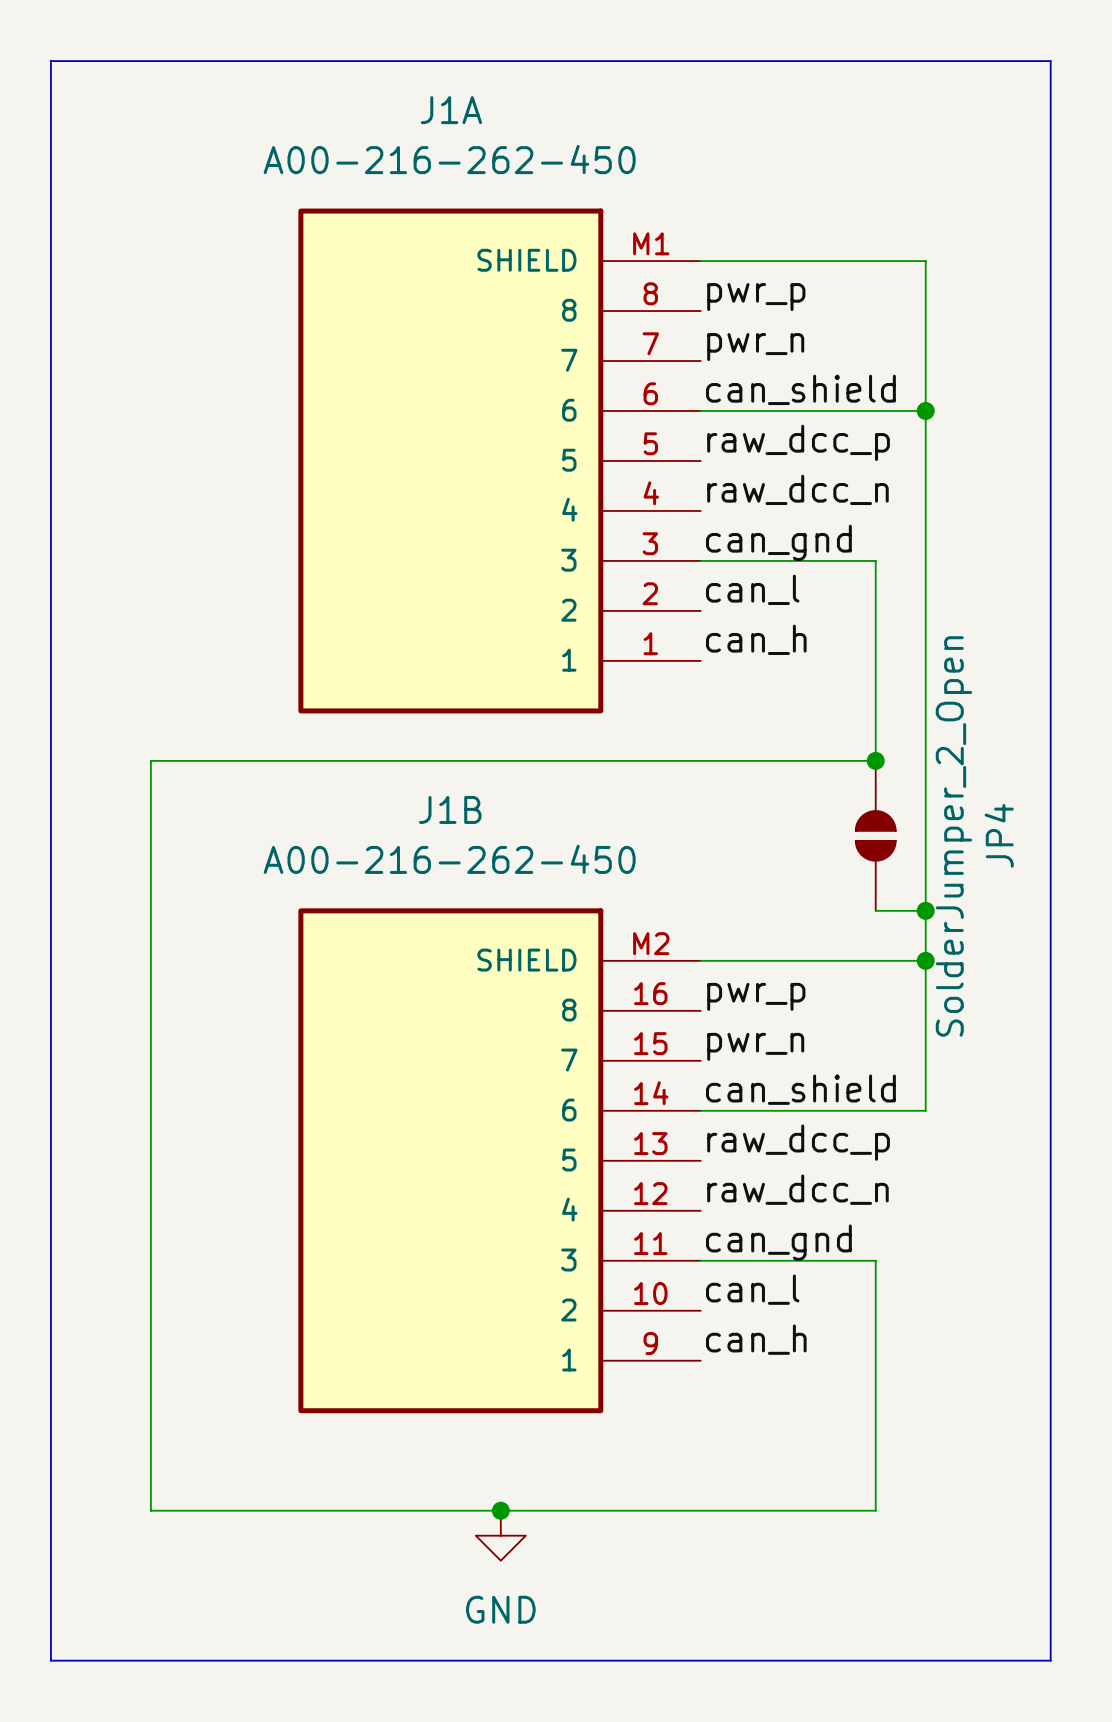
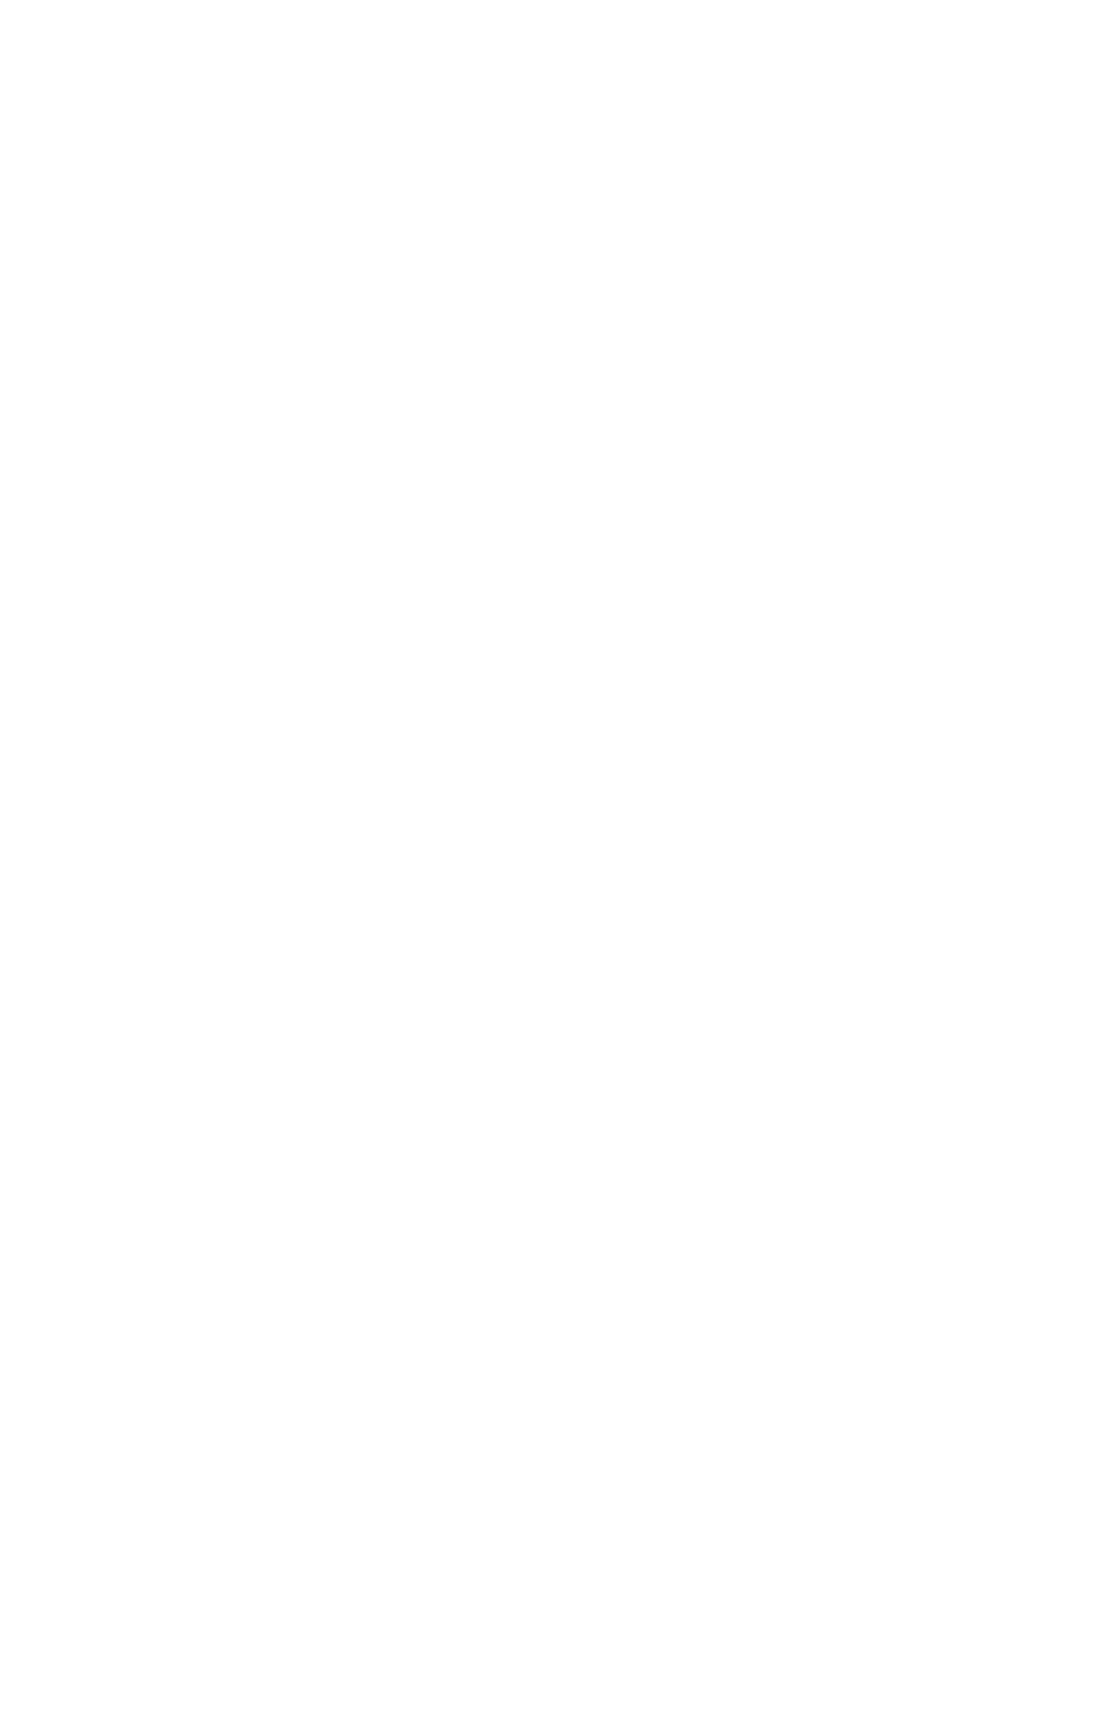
line: (50, 61) (1050, 61) (1050, 1660) (50, 1660) (50, 61) -> none
wire: (700, 261) (925, 261) (925, 1110) (700, 1110) -> none
label: pwr_p (756, 297) -> none
label: pwr_n (755, 347) -> none
label: can_shield (800, 389) -> none
wire: (700, 410) (925, 410) -> none
junction: (925, 410) -> none
label: raw_dcc_p (798, 442) -> none
J1A: A00-216-262-450 (499, 460) -> none
label: raw_dcc_n (797, 489) -> none
label: can_gnd (778, 542) -> none
wire: (700, 560) (875, 560) (875, 760) (150, 760) (150, 1510) (875, 1510) (875, 1260) (700, 1260) -> none
label: can_l (752, 589) -> none
label: can_h (756, 639) -> none
junction: (875, 760) -> none
JP4: SolderJumper_2_Open (875, 835) -> none
wire: (875, 910) (925, 910) -> none
junction: (925, 910) -> none
wire: (700, 960) (925, 960) -> none
junction: (925, 960) -> none
label: pwr_p (756, 996) -> none
label: pwr_n (755, 1046) -> none
label: can_shield (800, 1089) -> none
label: raw_dcc_p (798, 1142) -> none
J1B: A00-216-262-450 (499, 1160) -> none
label: raw_dcc_n (797, 1189) -> none
label: can_gnd (778, 1242) -> none
label: can_l (752, 1289) -> none
label: can_h (756, 1339) -> none
junction: (500, 1510) -> none
power symbol: GND (500, 1535) -> none

